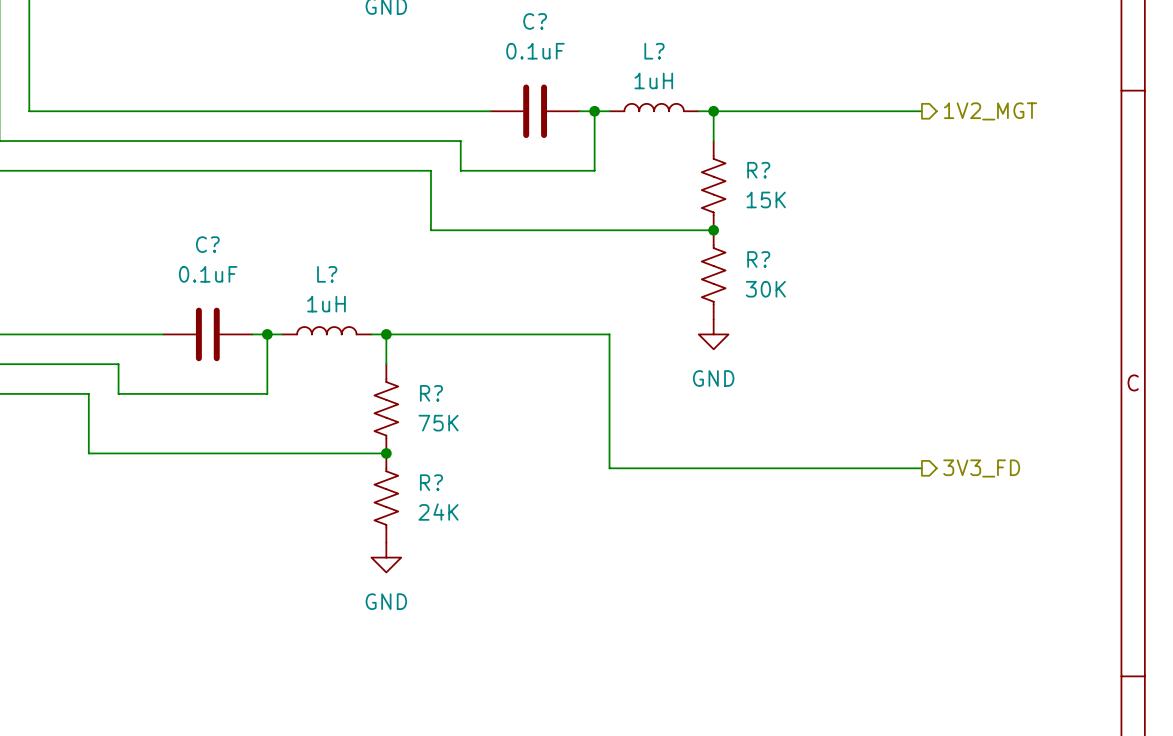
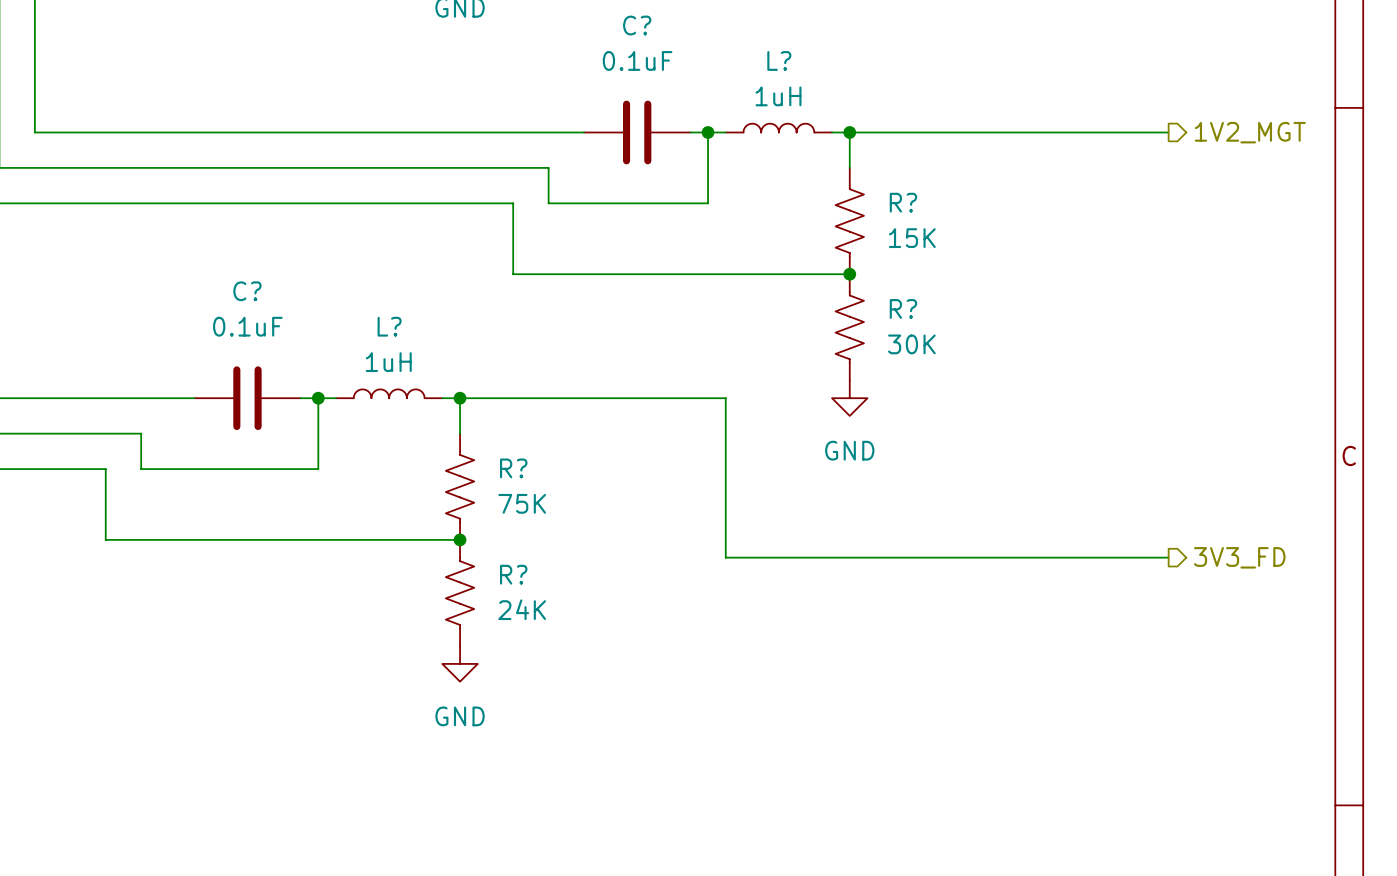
wire: none -> (1097, 132) (1168, 132)
hierarchical label position: 1V2_MGT (990, 111) -> 1V2_MGT (1250, 132)
wire: none -> (1097, 557) (1168, 557)
hierarchical label position: 3V3_FD (981, 468) -> 3V3_FD (1239, 557)

